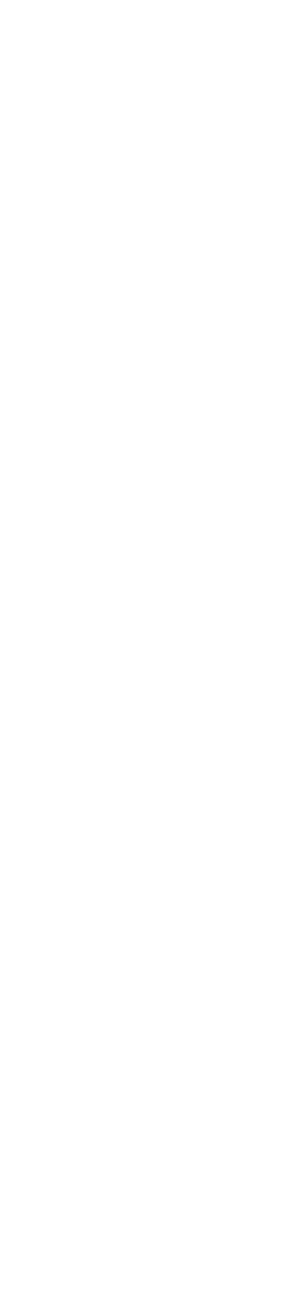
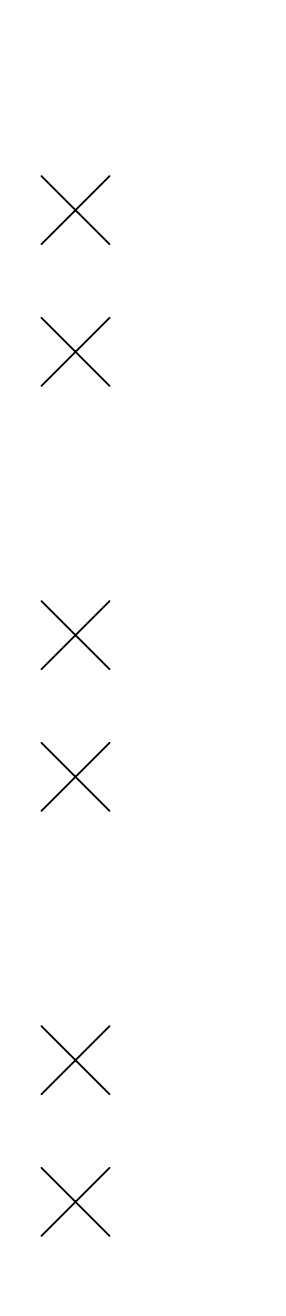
no-connect mark: none -> (75, 210)
no-connect mark: none -> (75, 351)
no-connect mark: none -> (75, 635)
no-connect mark: none -> (75, 776)
no-connect mark: none -> (75, 1060)
no-connect mark: none -> (75, 1201)

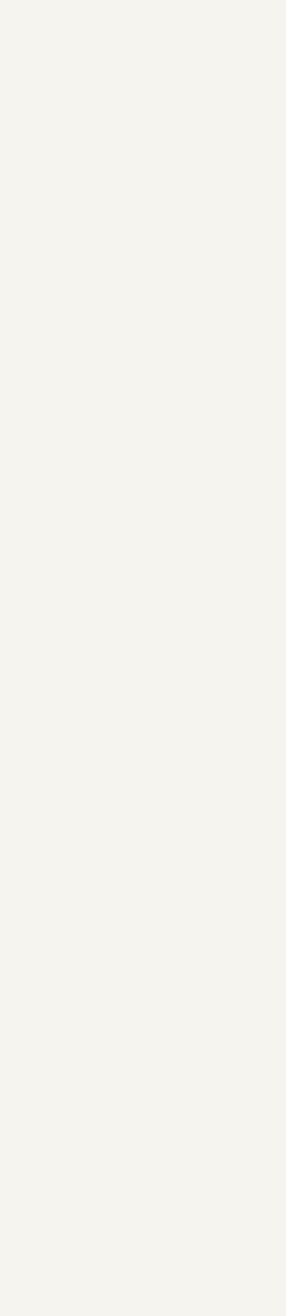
no-connect mark: (75, 210) -> none
no-connect mark: (75, 351) -> none
no-connect mark: (75, 635) -> none
no-connect mark: (75, 776) -> none
no-connect mark: (75, 1060) -> none
no-connect mark: (75, 1201) -> none

